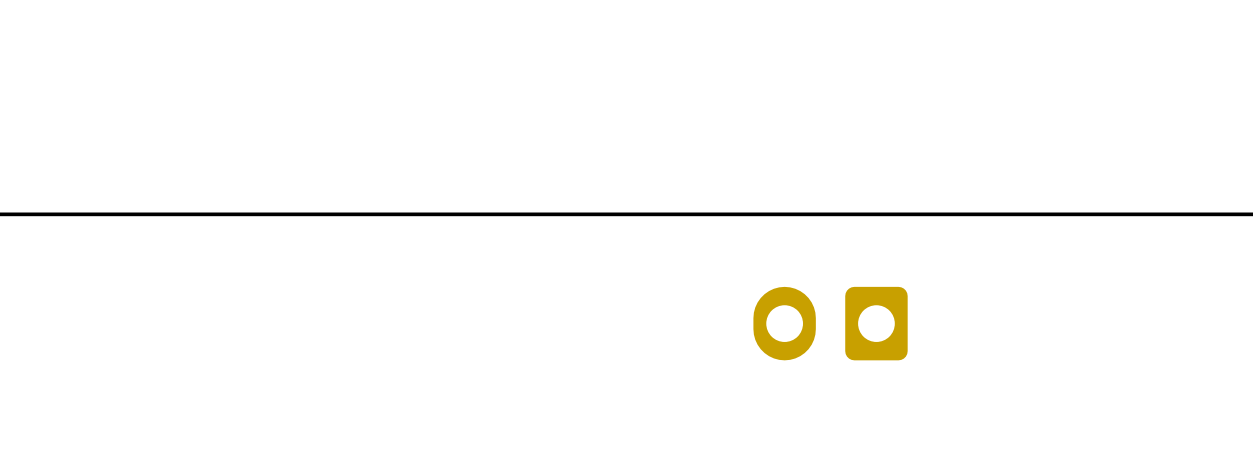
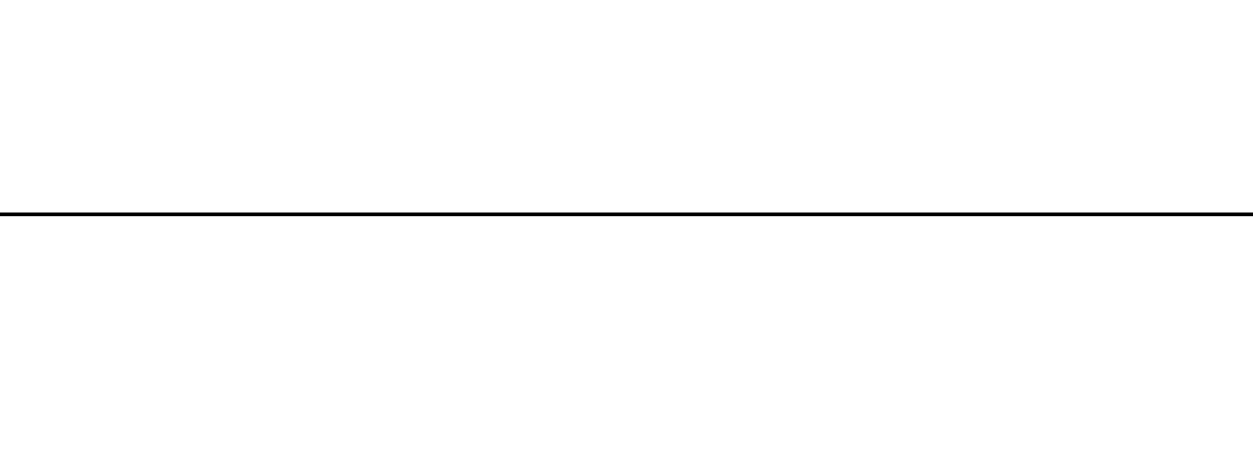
part: (830, 323) -> none

